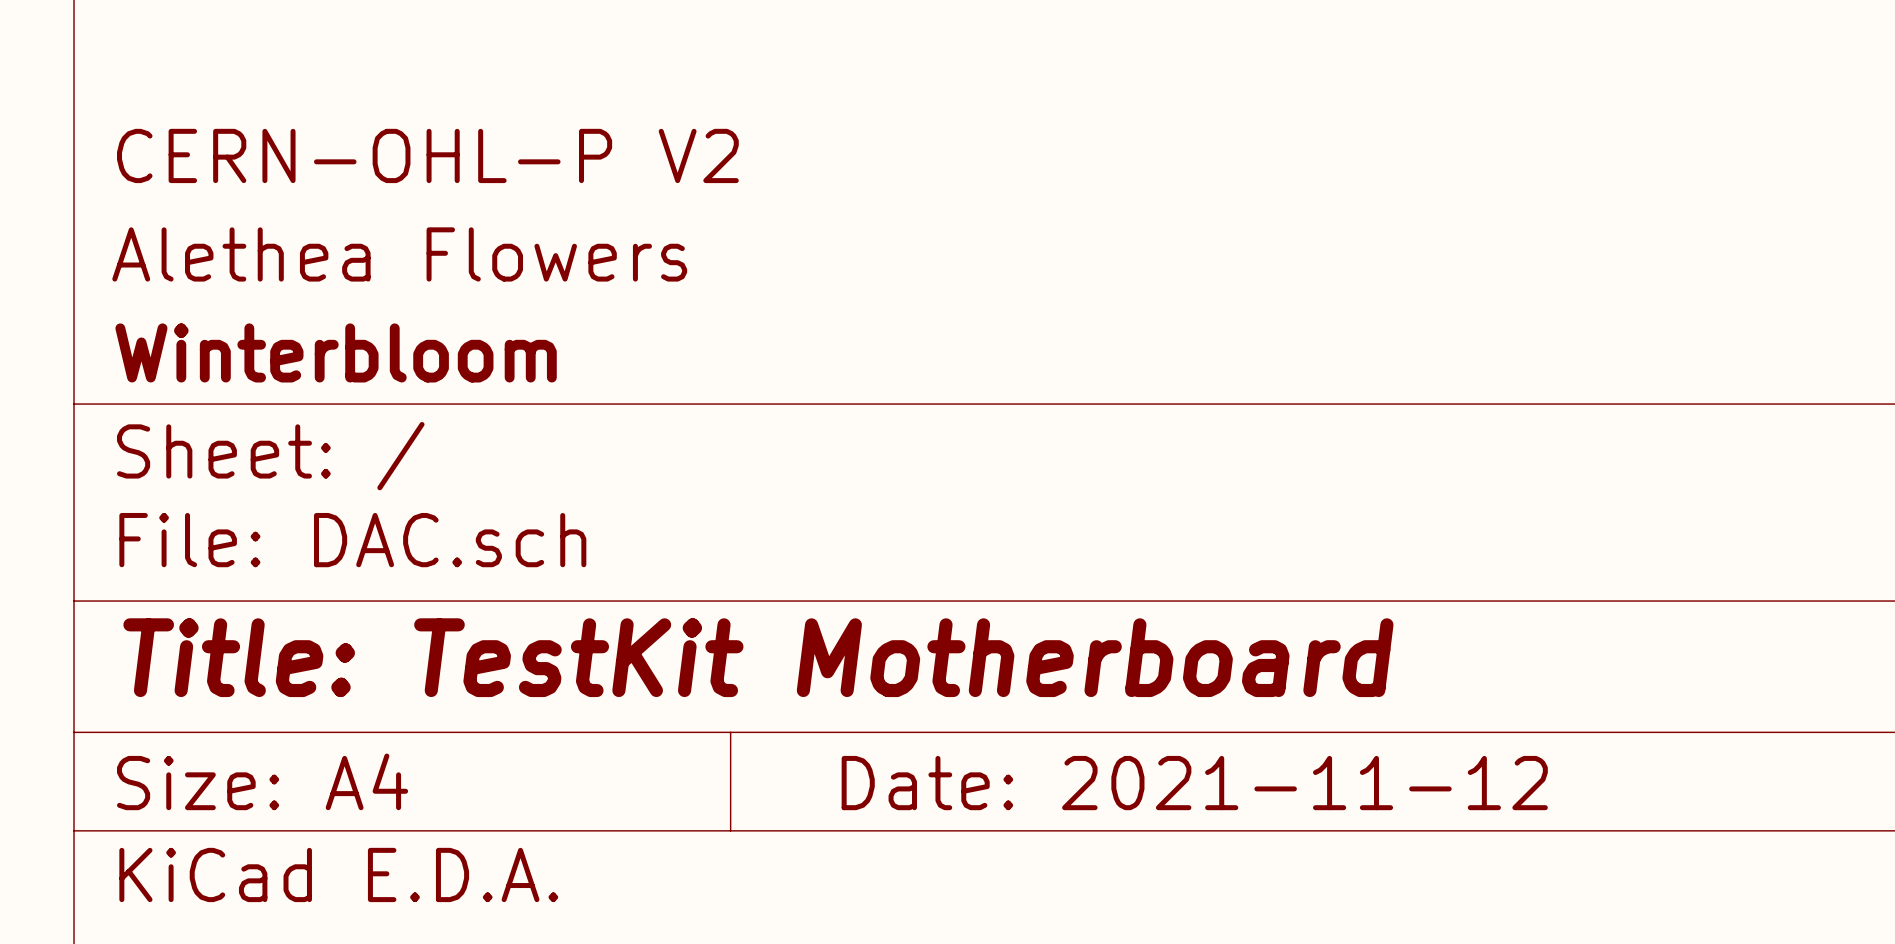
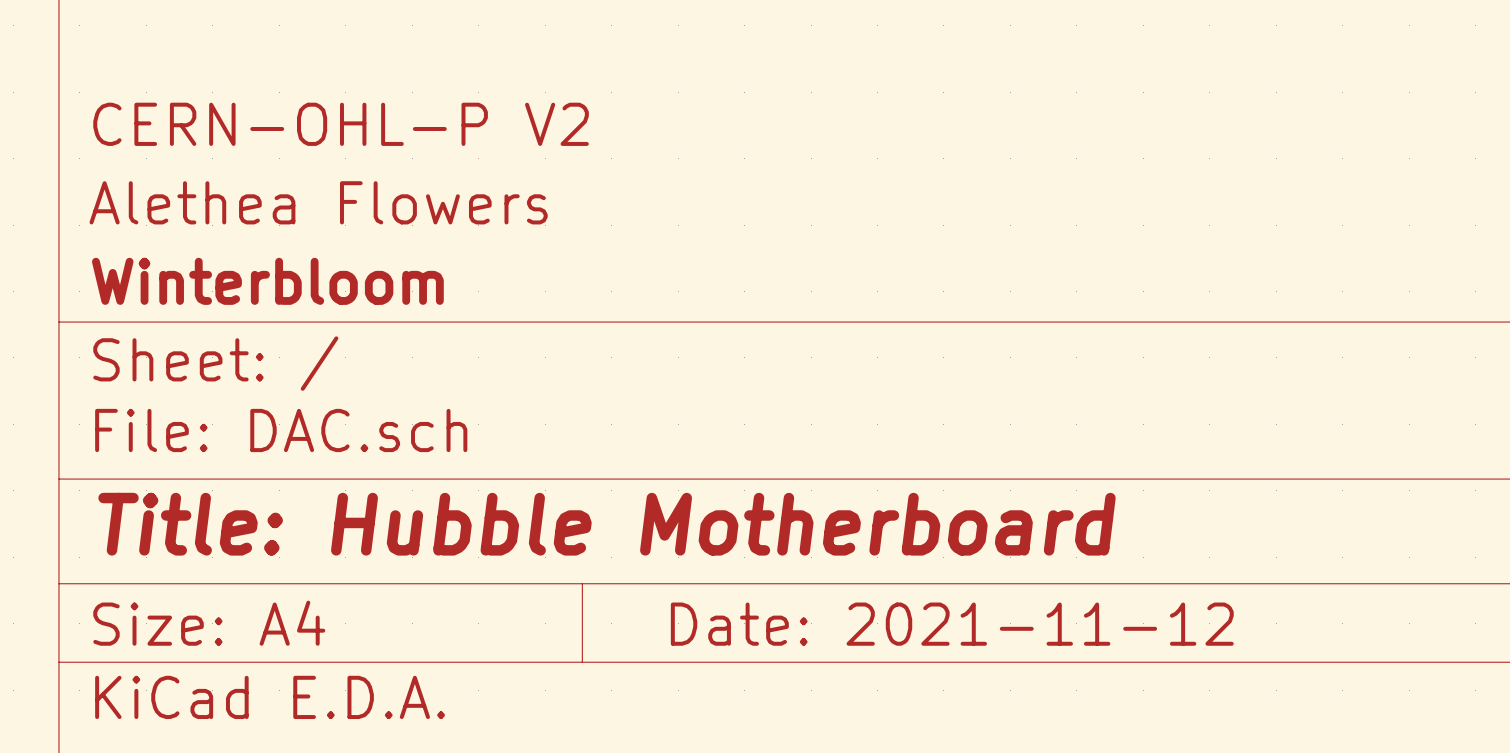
title block: Title: TestKit Motherboard (758, 657) -> Title: Hubble Motherboard (607, 524)

